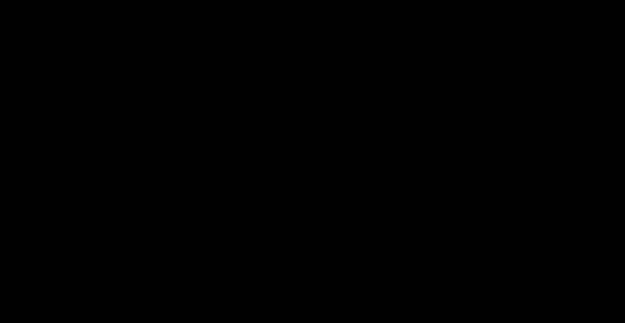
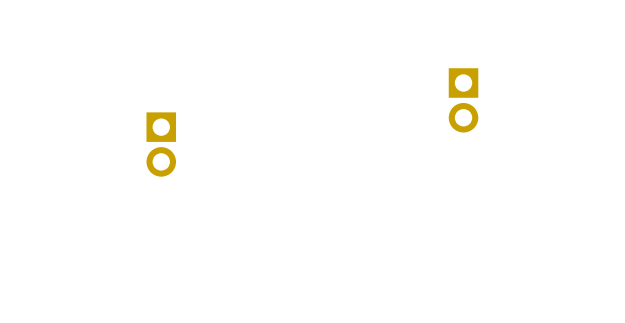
part: none -> (463, 100)
part: none -> (161, 144)

